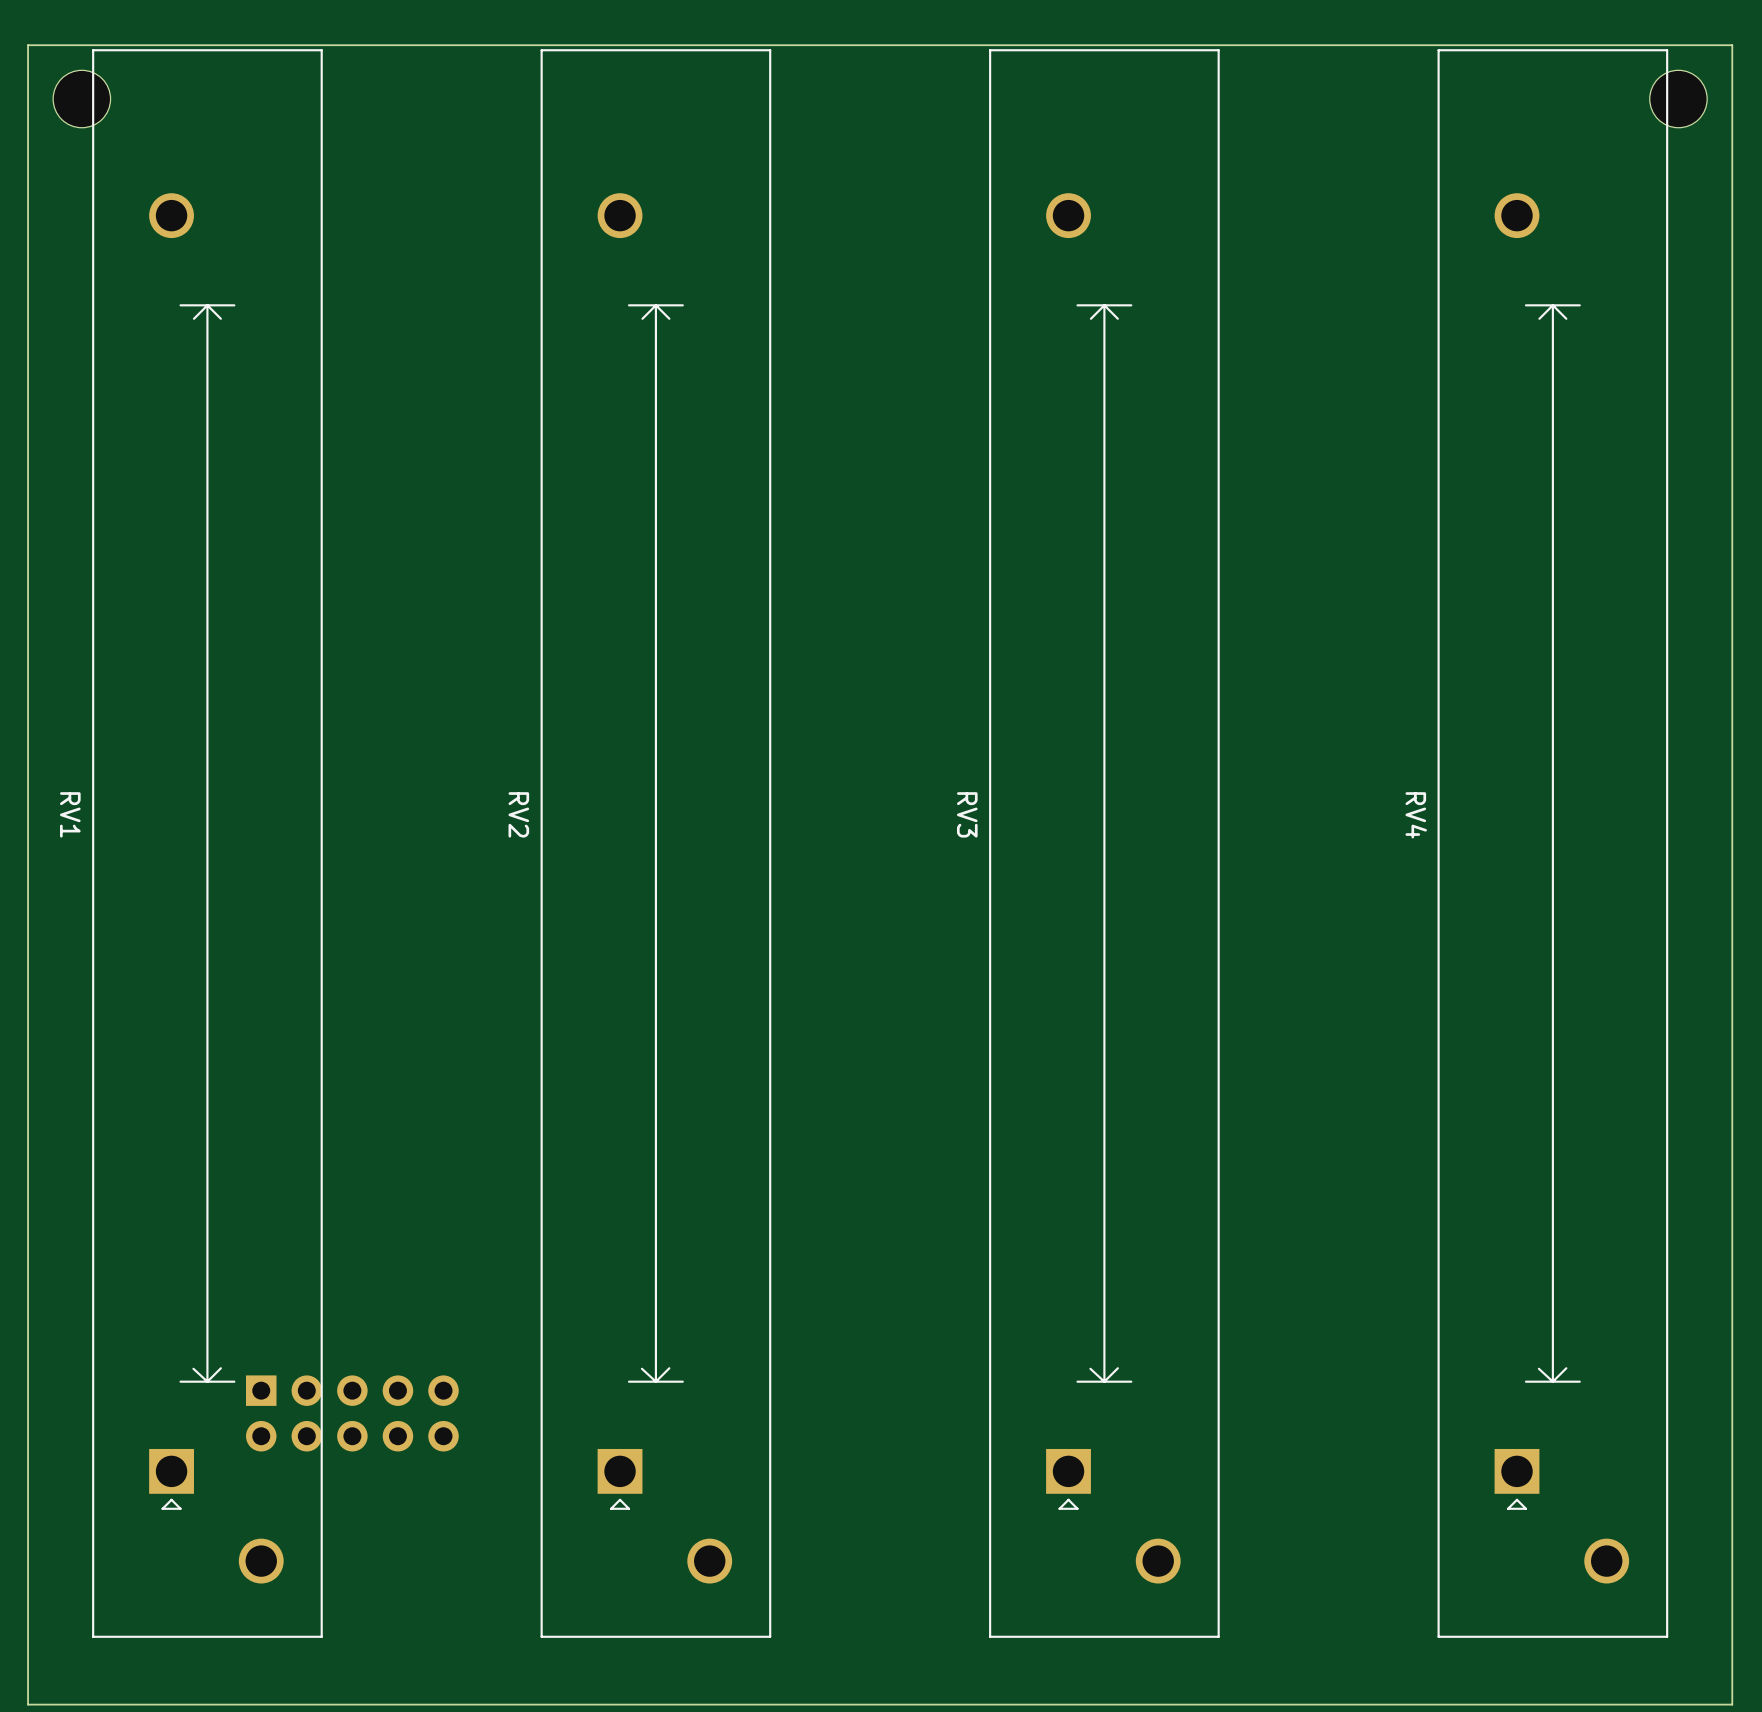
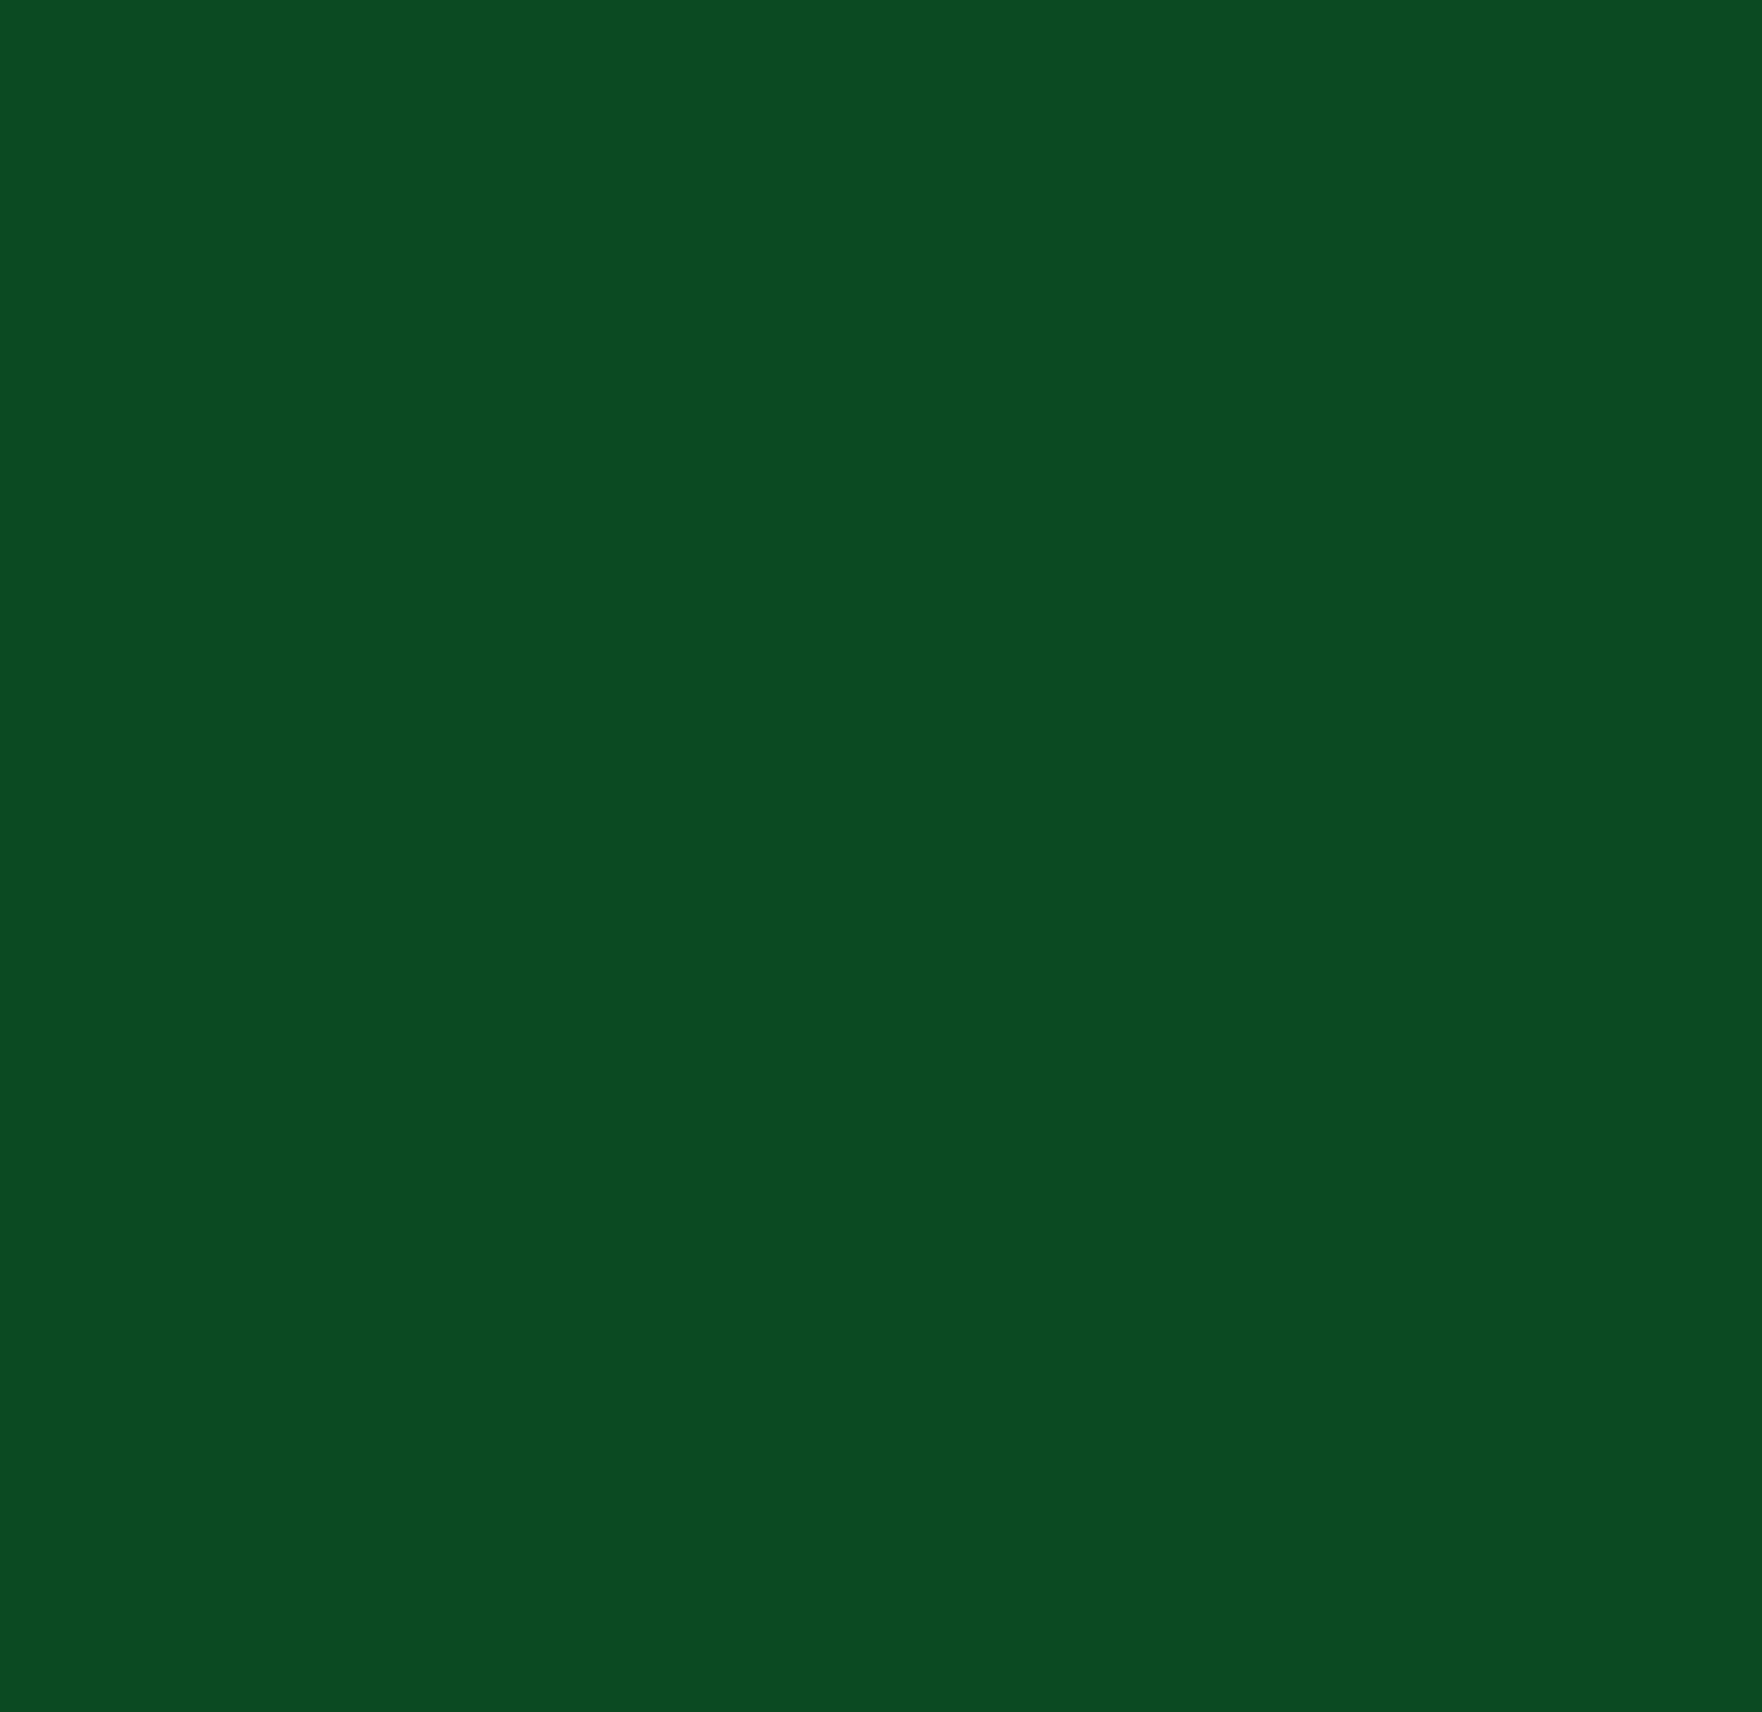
board edge: (1732, 45) (28, 45) (28, 1704) (1732, 1704) (1732, 45) -> none
part: (81, 99) -> none
part: (1678, 99) -> none
RV1: (207, 843) -> none
RV2: (655, 843) -> none
RV3: (1104, 843) -> none
RV4: (1552, 843) -> none
part: (352, 1413) -> none

